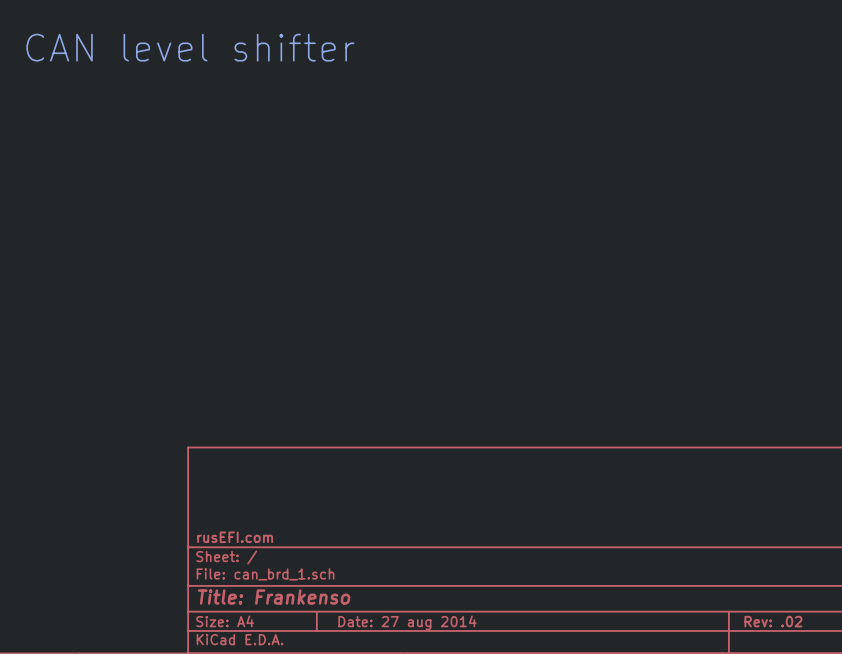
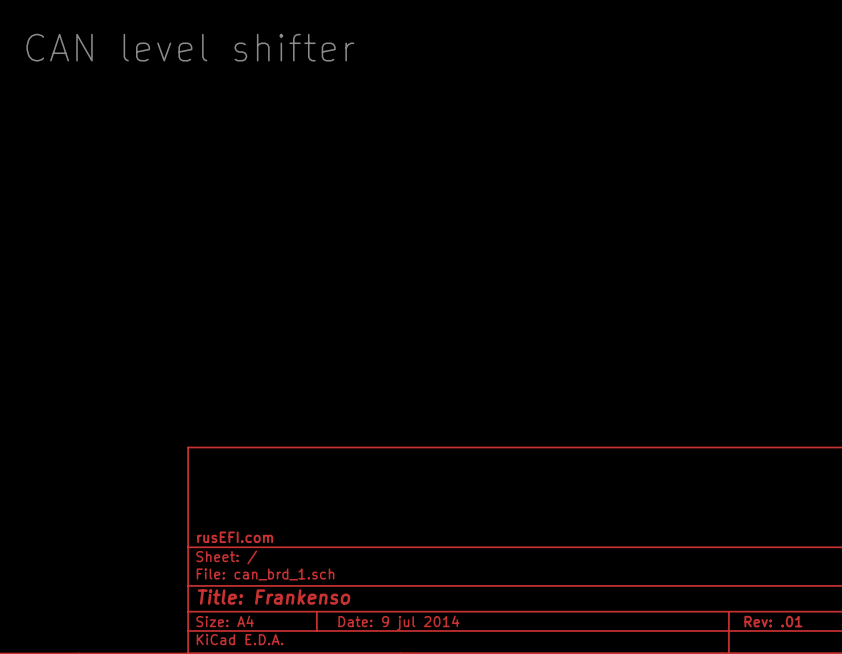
title block: Rev: .02 (773, 621) -> Rev: .01 (773, 621)
title block: Date: 27 aug 2014 (407, 622) -> Date: 9 jul 2014 (398, 622)

